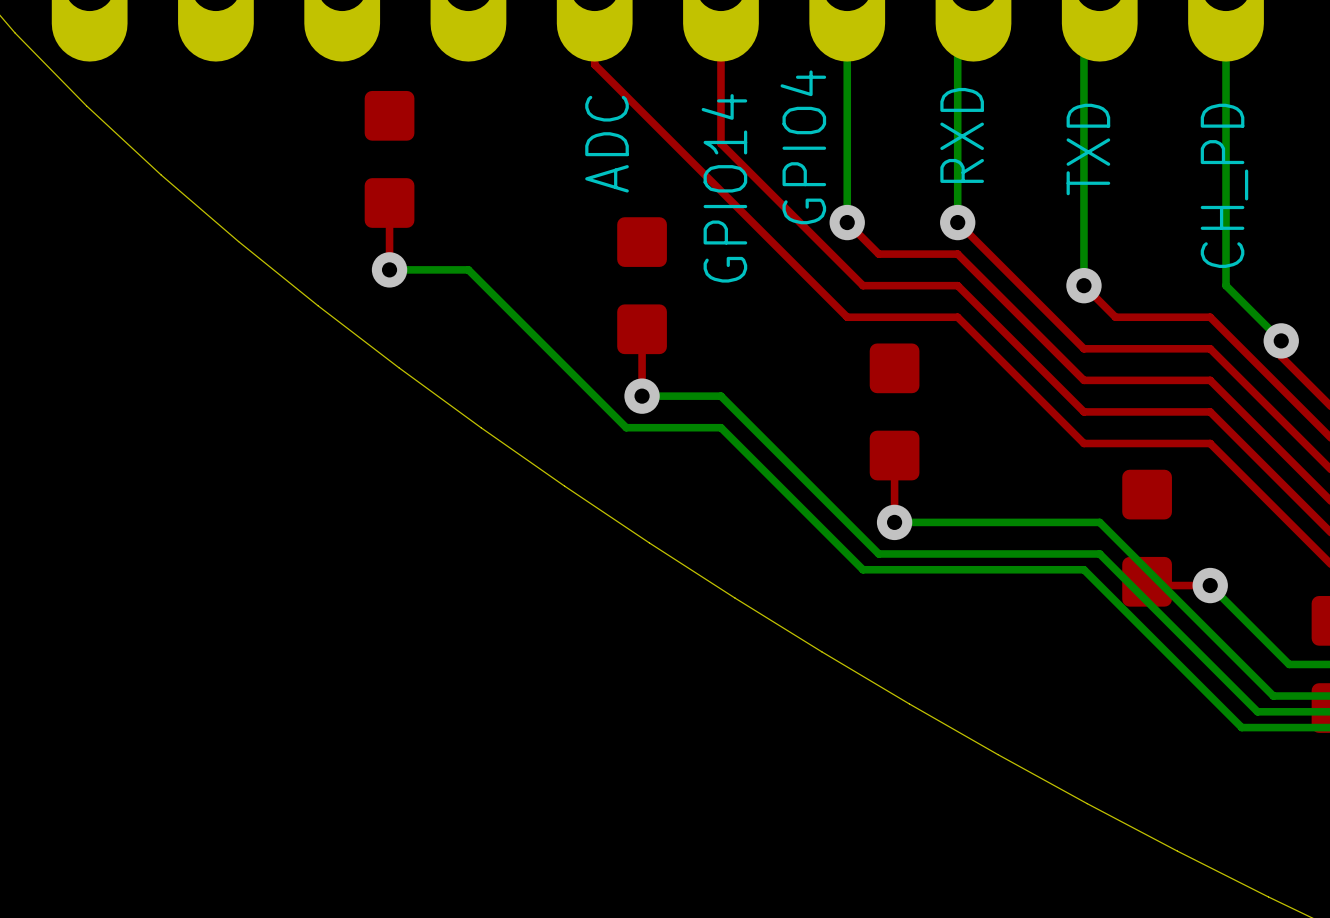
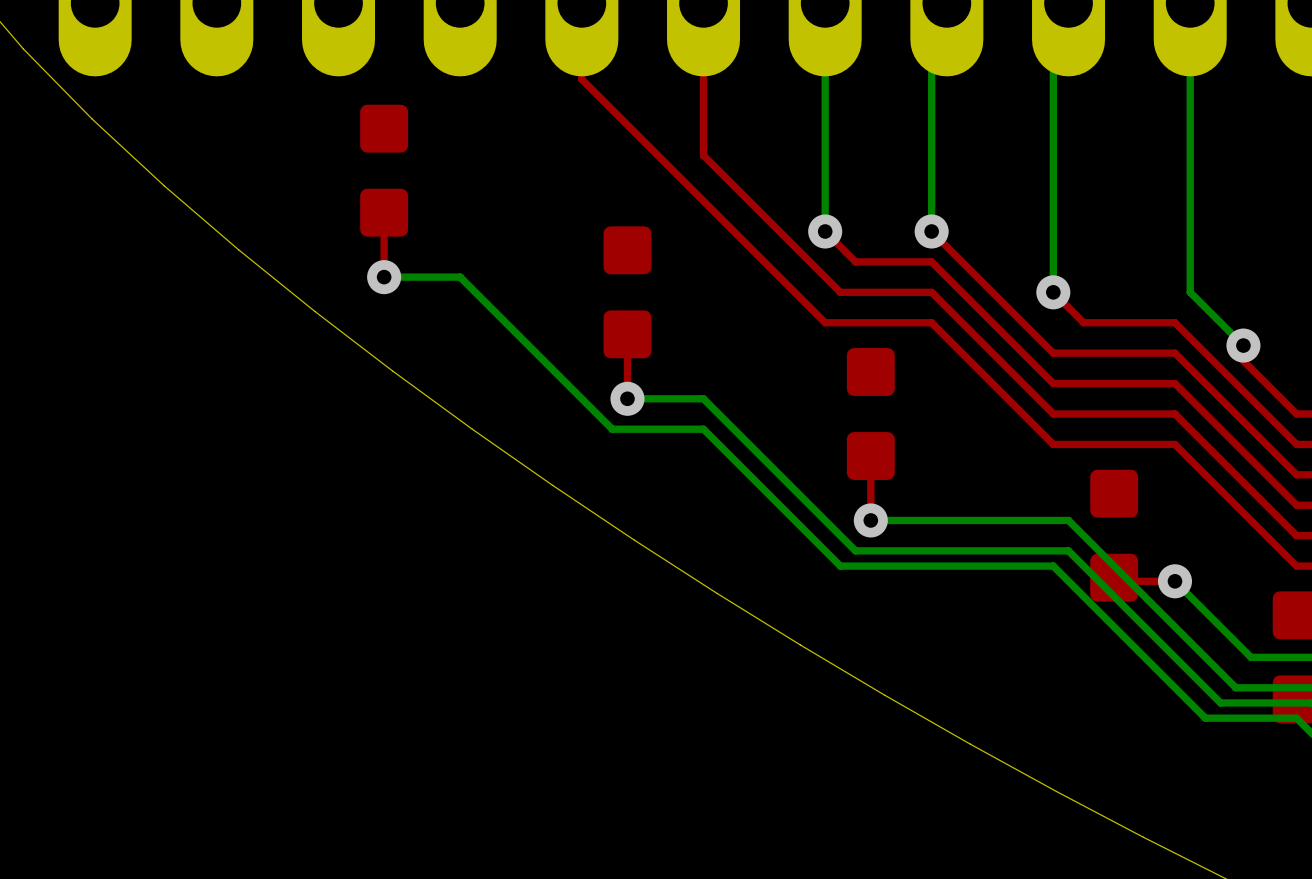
text: RXD (962, 135) -> none
text: ADC (607, 144) -> none
text: GPIO4 (803, 147) -> none
text: TXD (1088, 149) -> none
text: CH_PD (1224, 185) -> none
text: GPIO14 (724, 188) -> none

